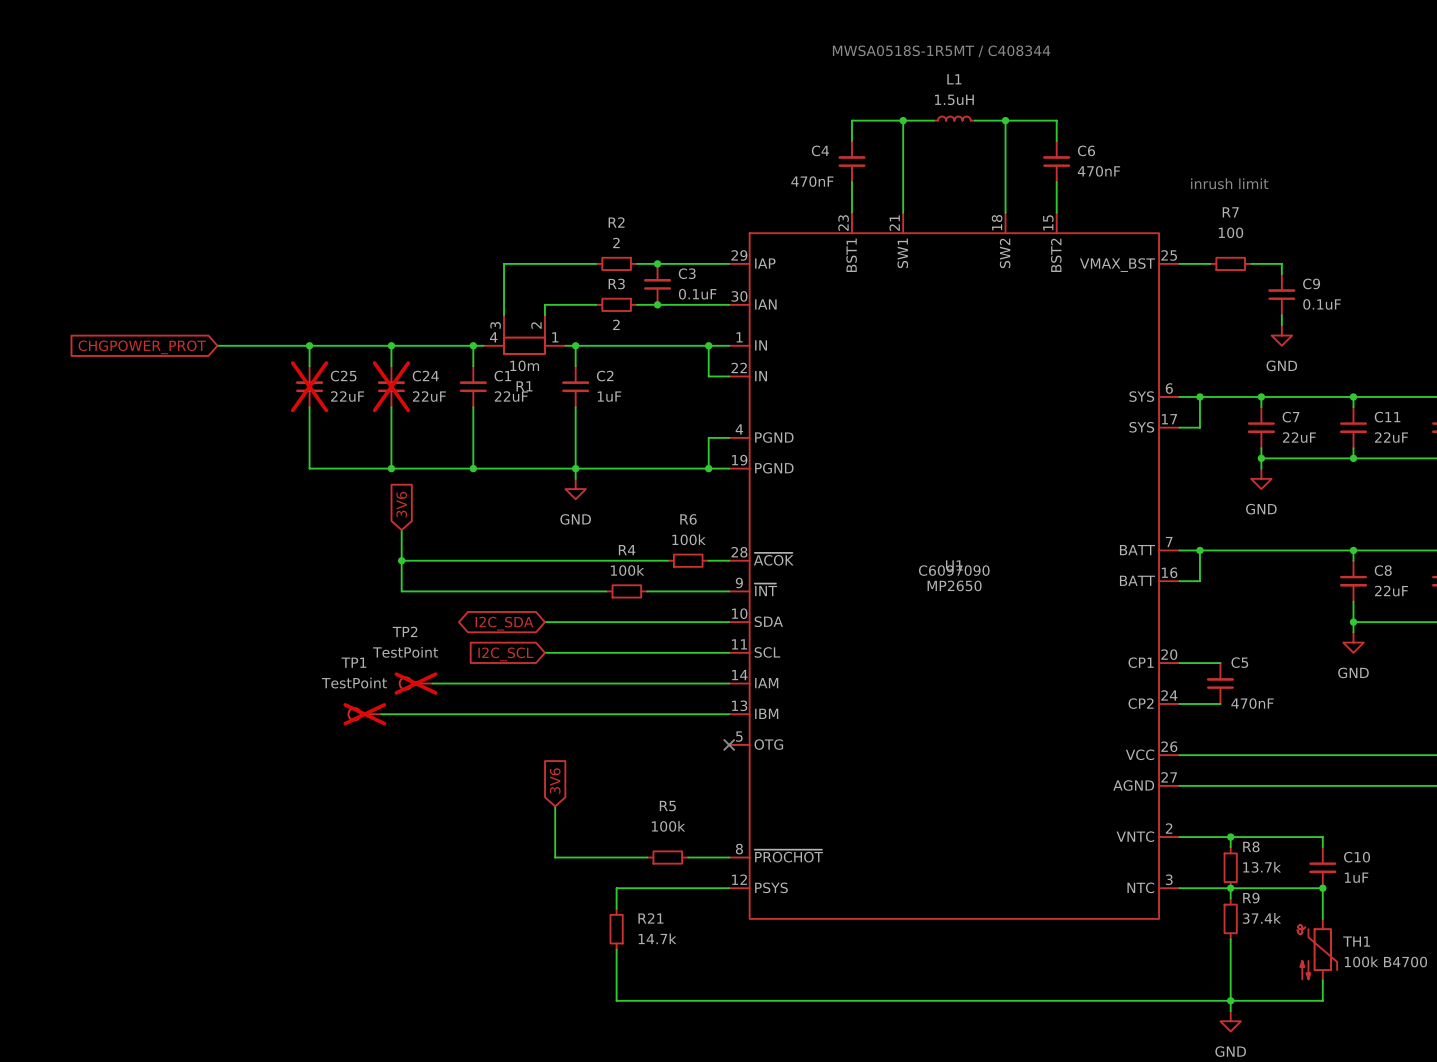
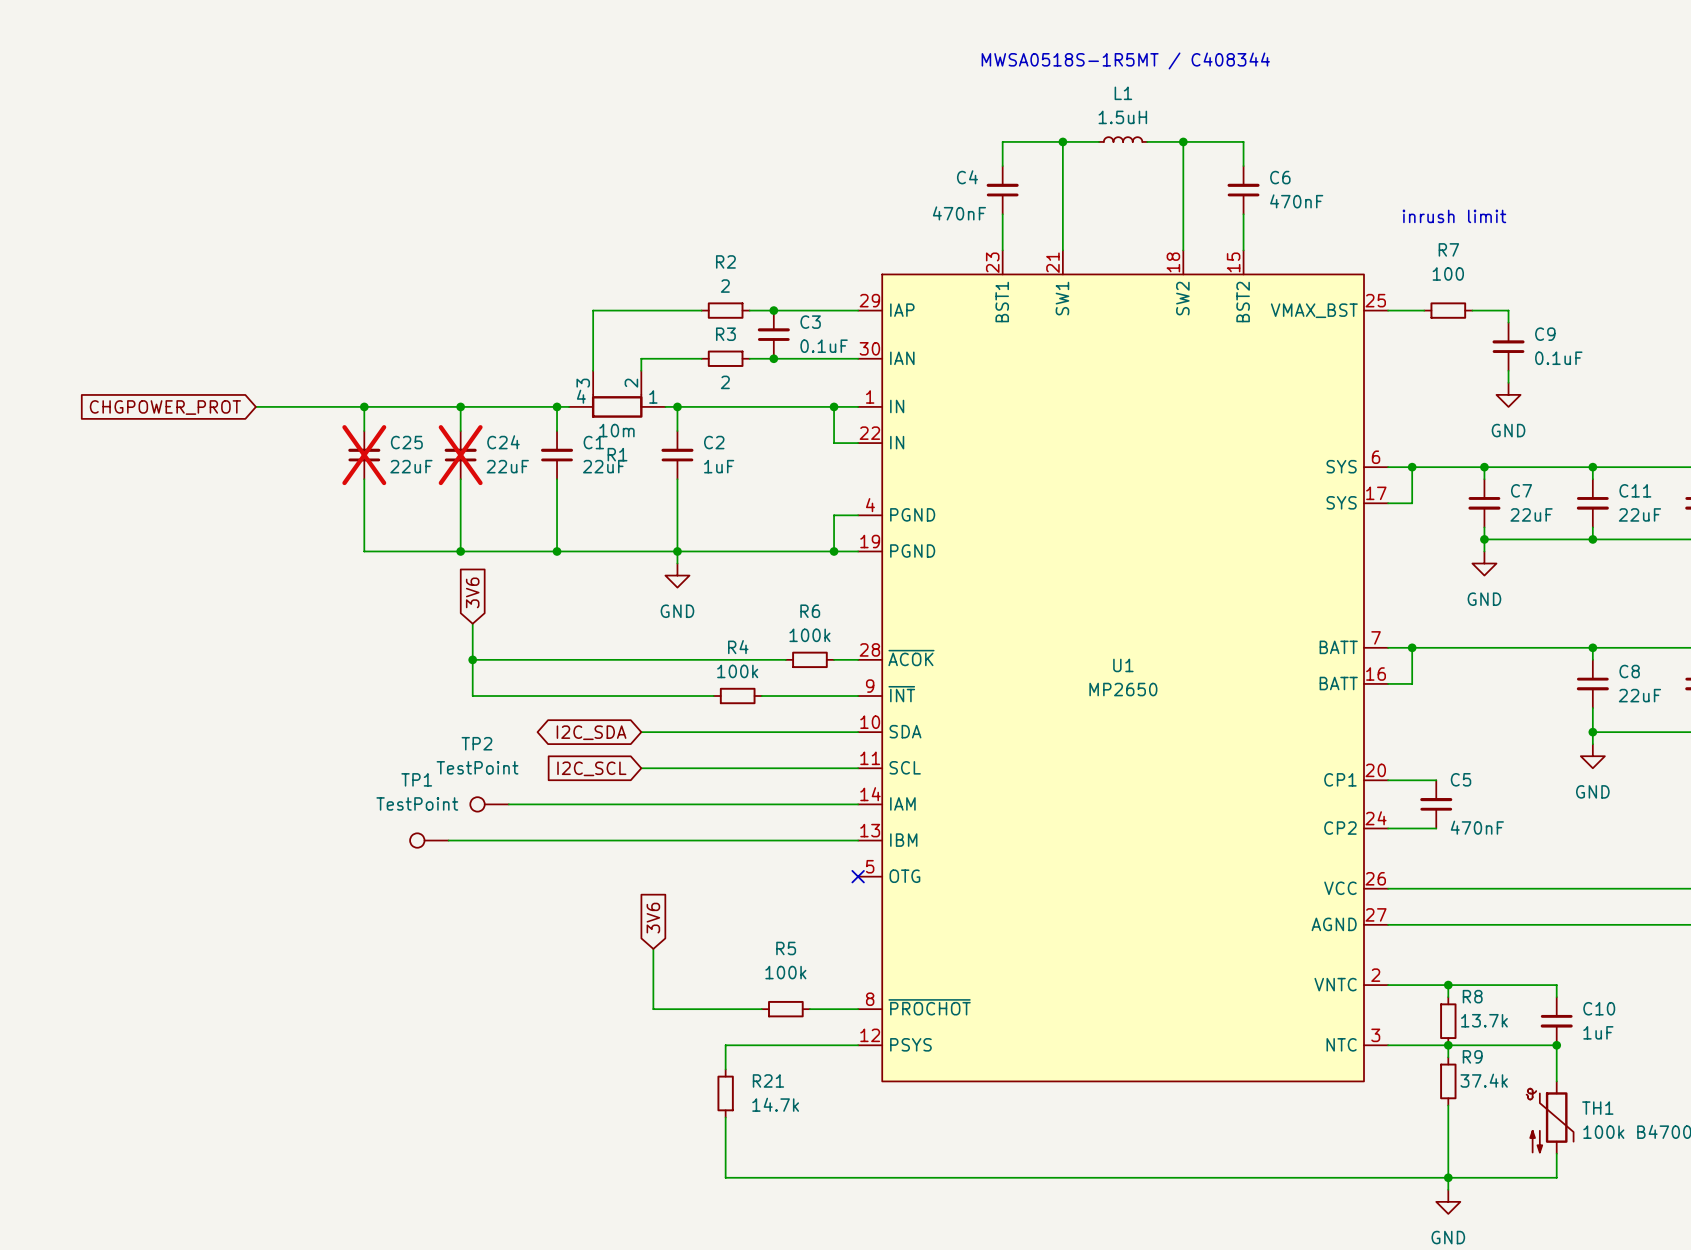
U1 text: C6097090 (954, 570) -> none
TP2 do-not-place cross: (416, 683) -> none
TP1 do-not-place cross: (364, 714) -> none

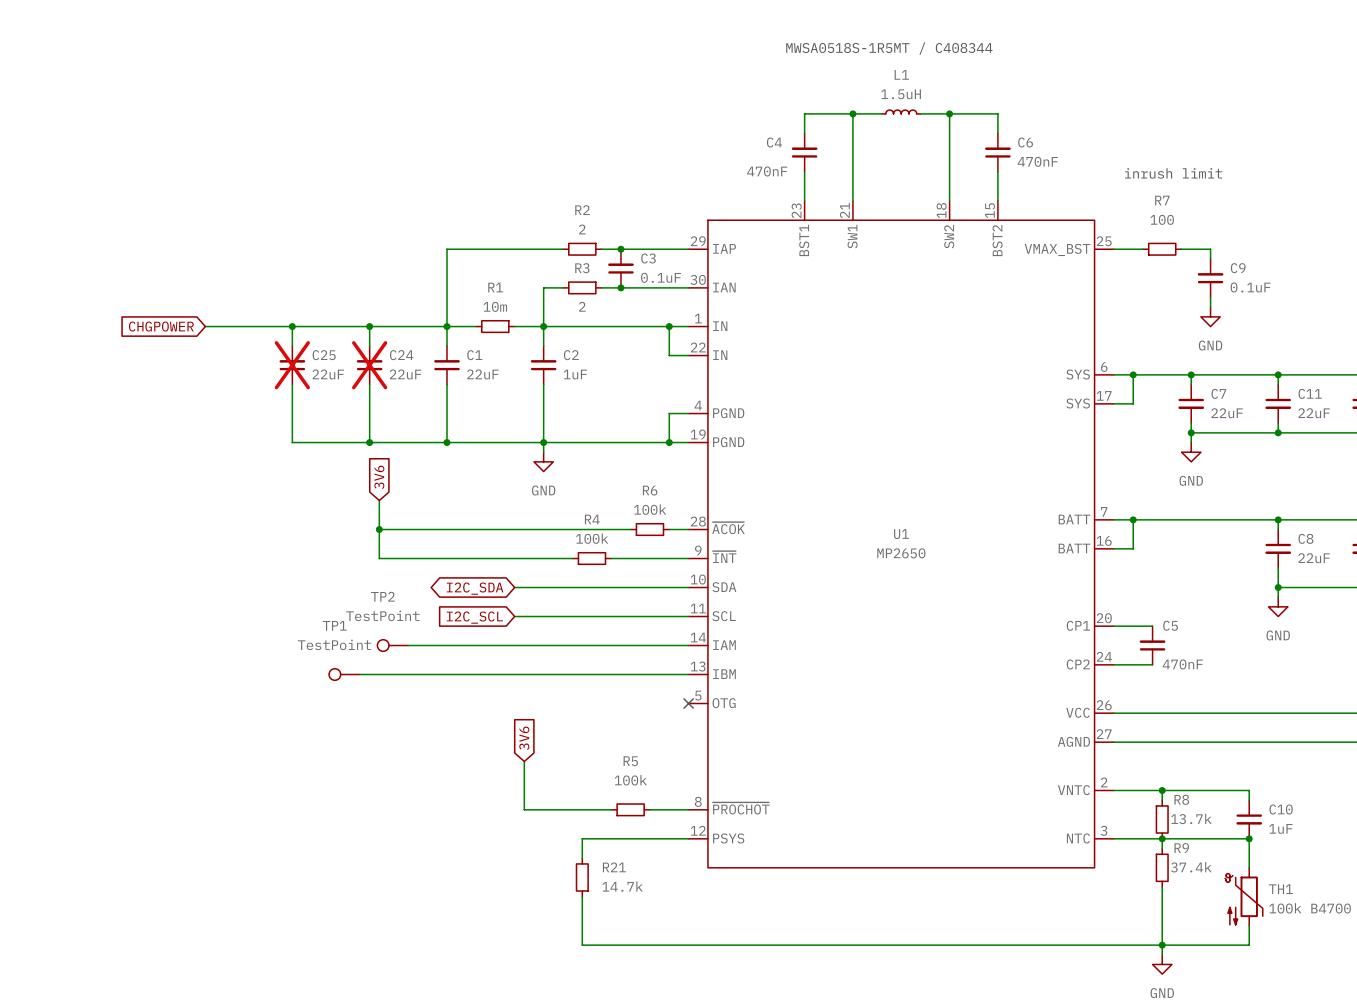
wire: (593, 310) (593, 370) -> (475, 249) (446, 249) (446, 326)
wire: (677, 358) (641, 358) (641, 370) -> (543, 287) (543, 326)
R1 symbol: [569, 370, 666, 418] -> [475, 319, 515, 334]
global label: CHGPOWER_PROT (165, 407) -> CHGPOWER (161, 326)
R1 value position: 10m (616, 430) -> 10m (495, 306)
R1 name position: R1 (617, 454) -> R1 (495, 287)

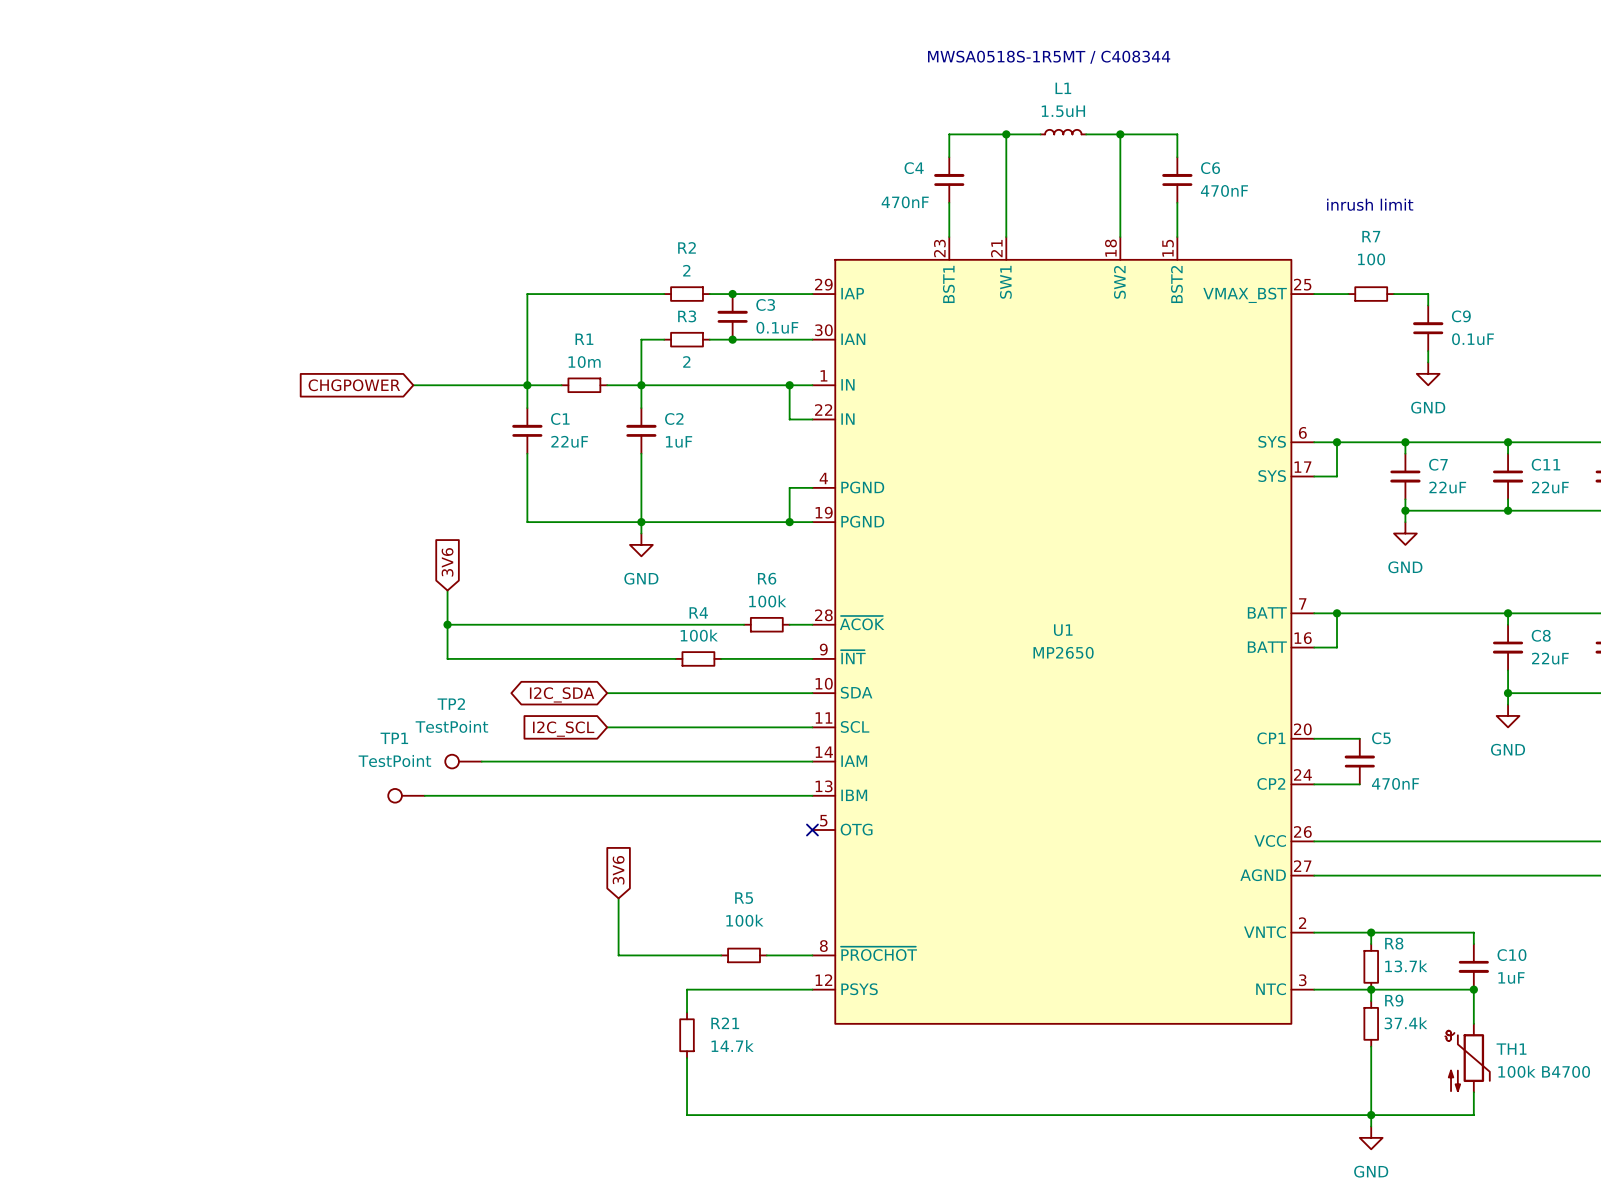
global label position: CHGPOWER (161, 326) -> CHGPOWER (354, 385)
wire: (205, 326) (350, 326) -> none
wire: (292, 326) (292, 345) -> none
junction: (292, 326) -> none
wire: (369, 326) (369, 345) -> none
junction: (369, 326) -> none
C25: 22uF (292, 365) -> none
C24: 22uF (369, 365) -> none
wire: (292, 384) (292, 442) (446, 442) -> none
wire: (369, 384) (369, 442) -> none
junction: (369, 442) -> none
junction: (446, 442) -> none

